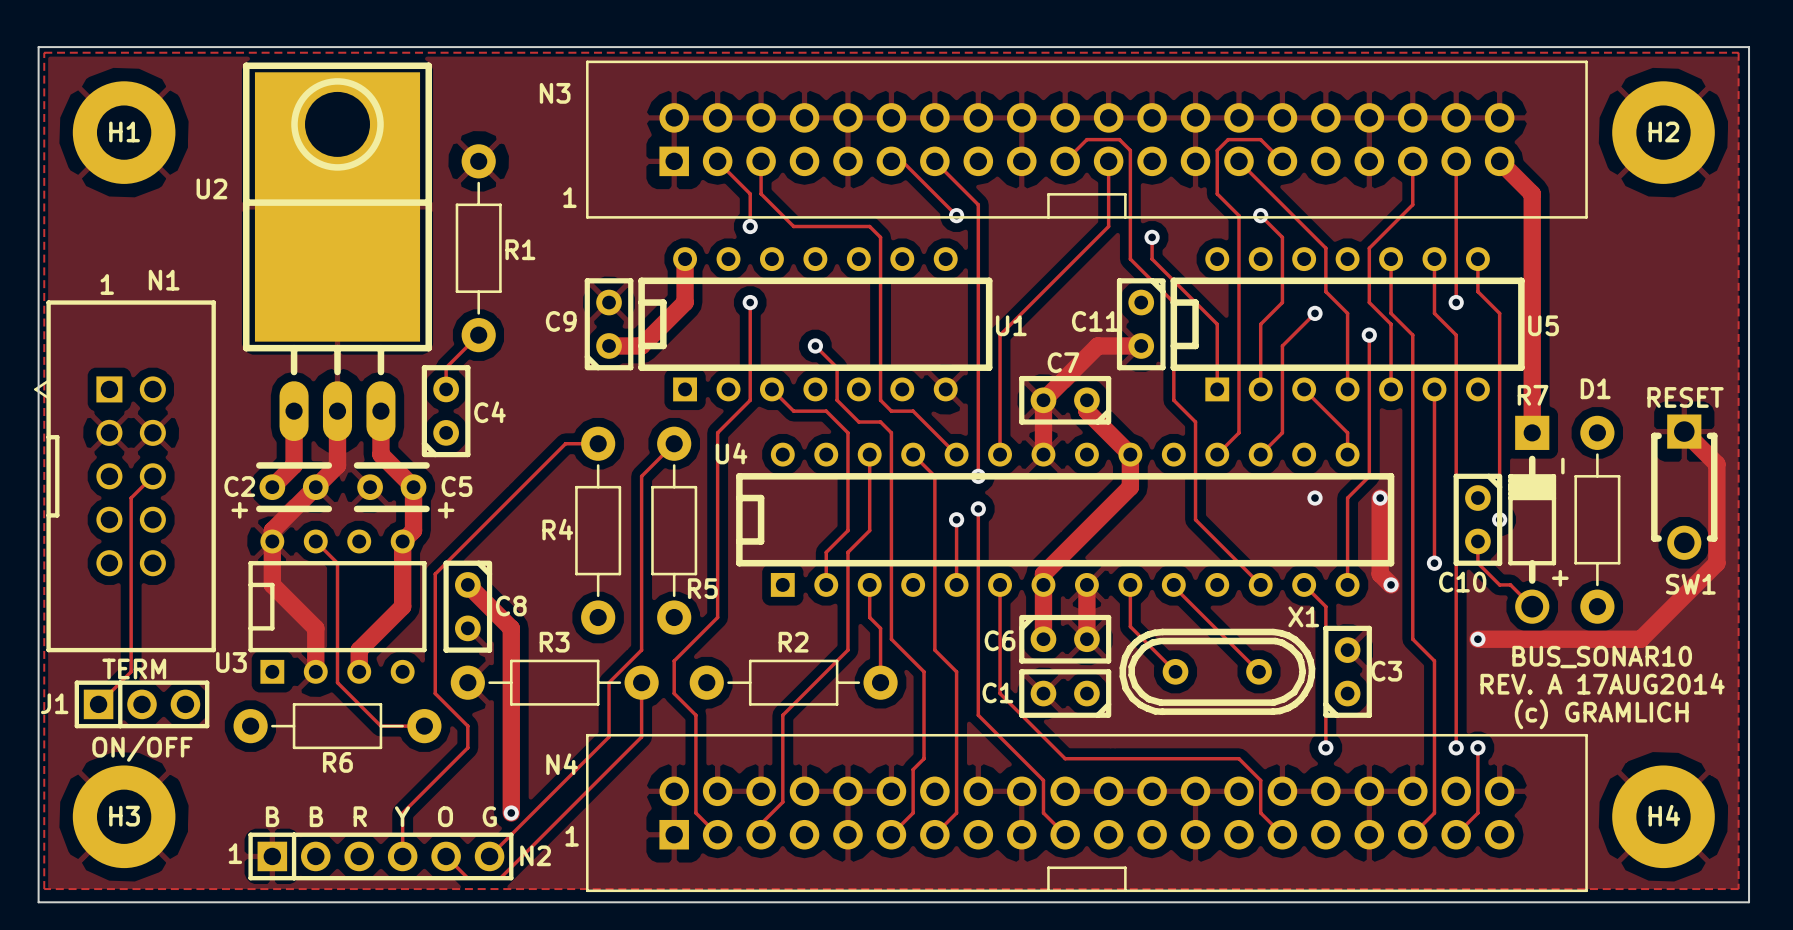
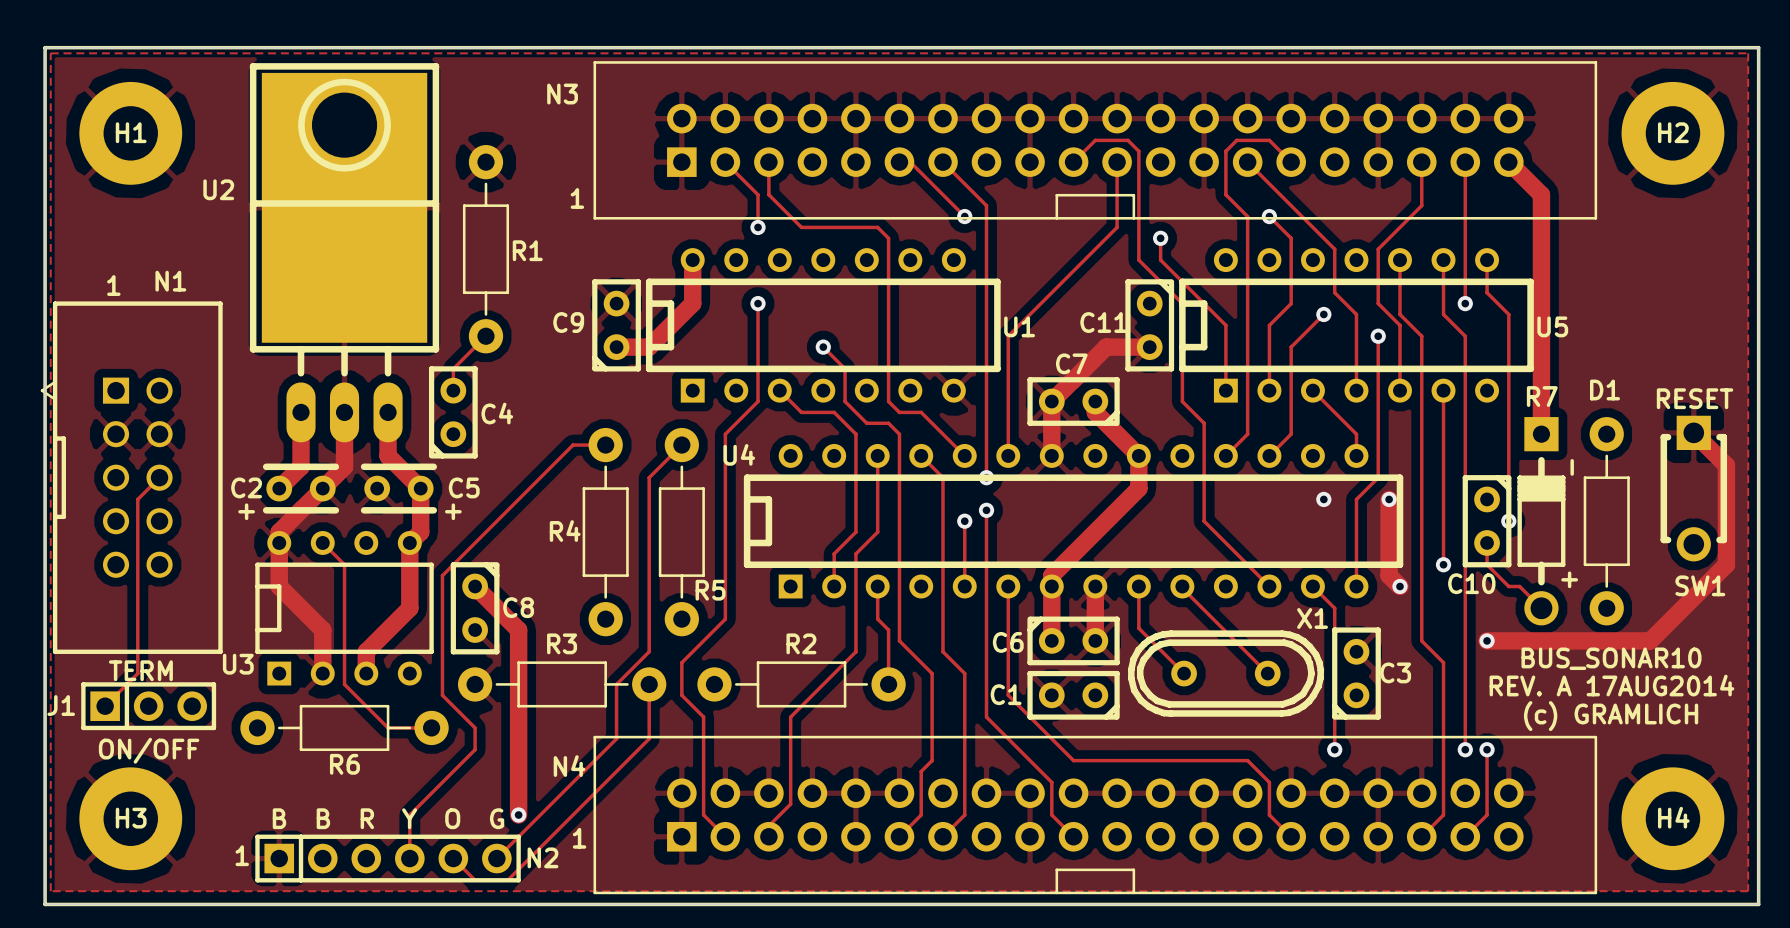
line: none -> (45, 47) (45, 904) (1758, 904) (1758, 47) (45, 47)

